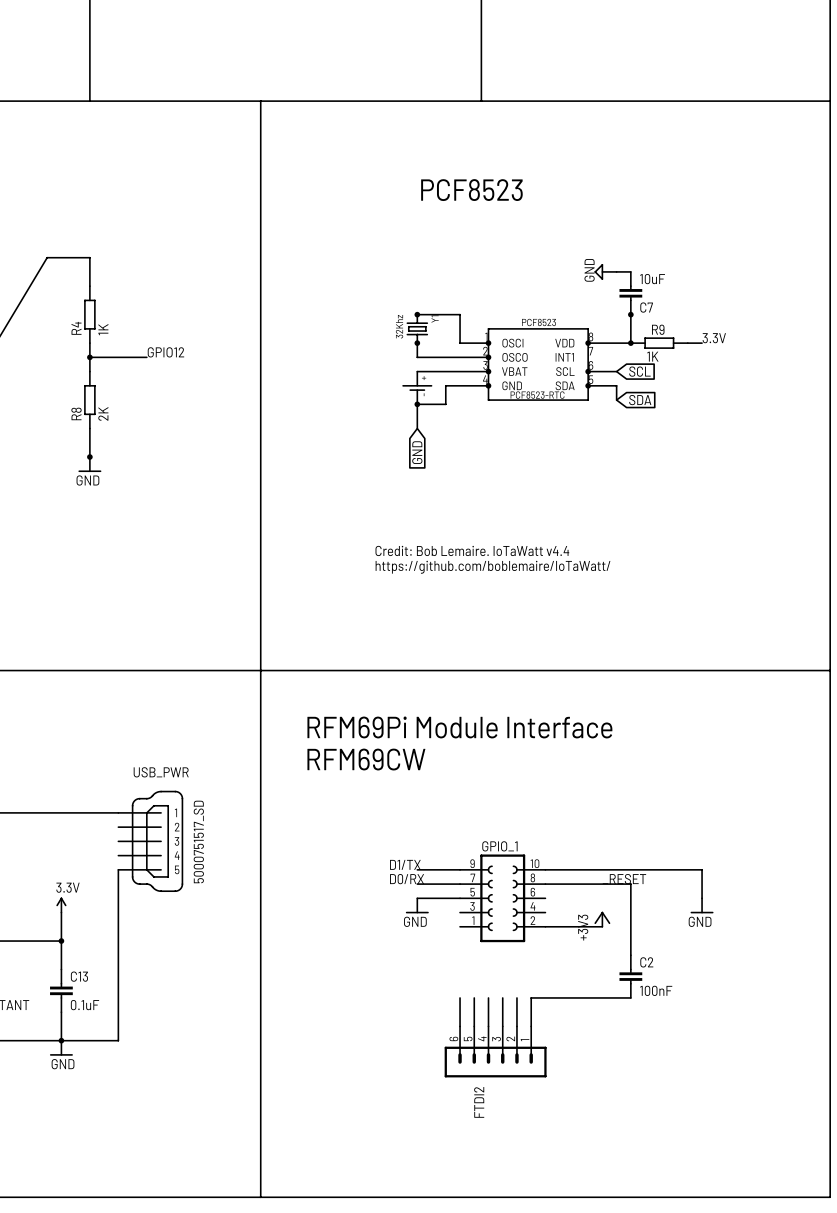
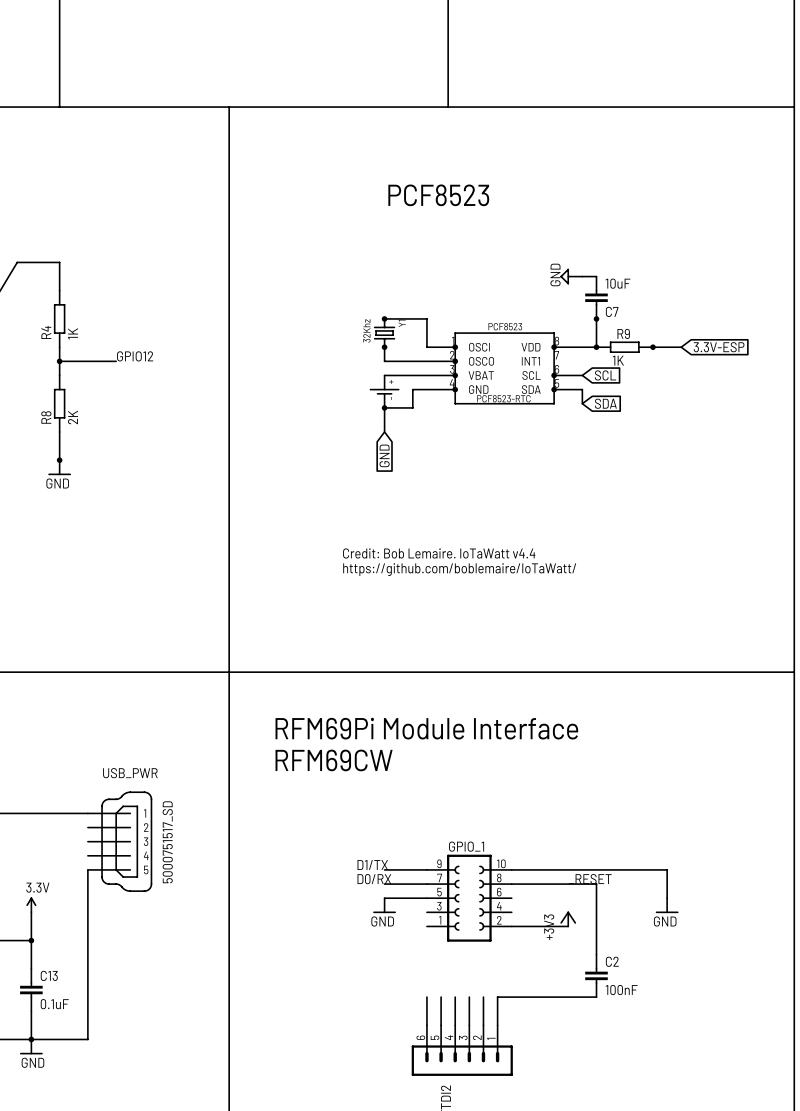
label: 3.3V (714, 338) -> none
junction: none -> (653, 347)
wire: none -> (667, 347) (681, 347)
global label: none -> 3.3V-ESP (719, 347)

